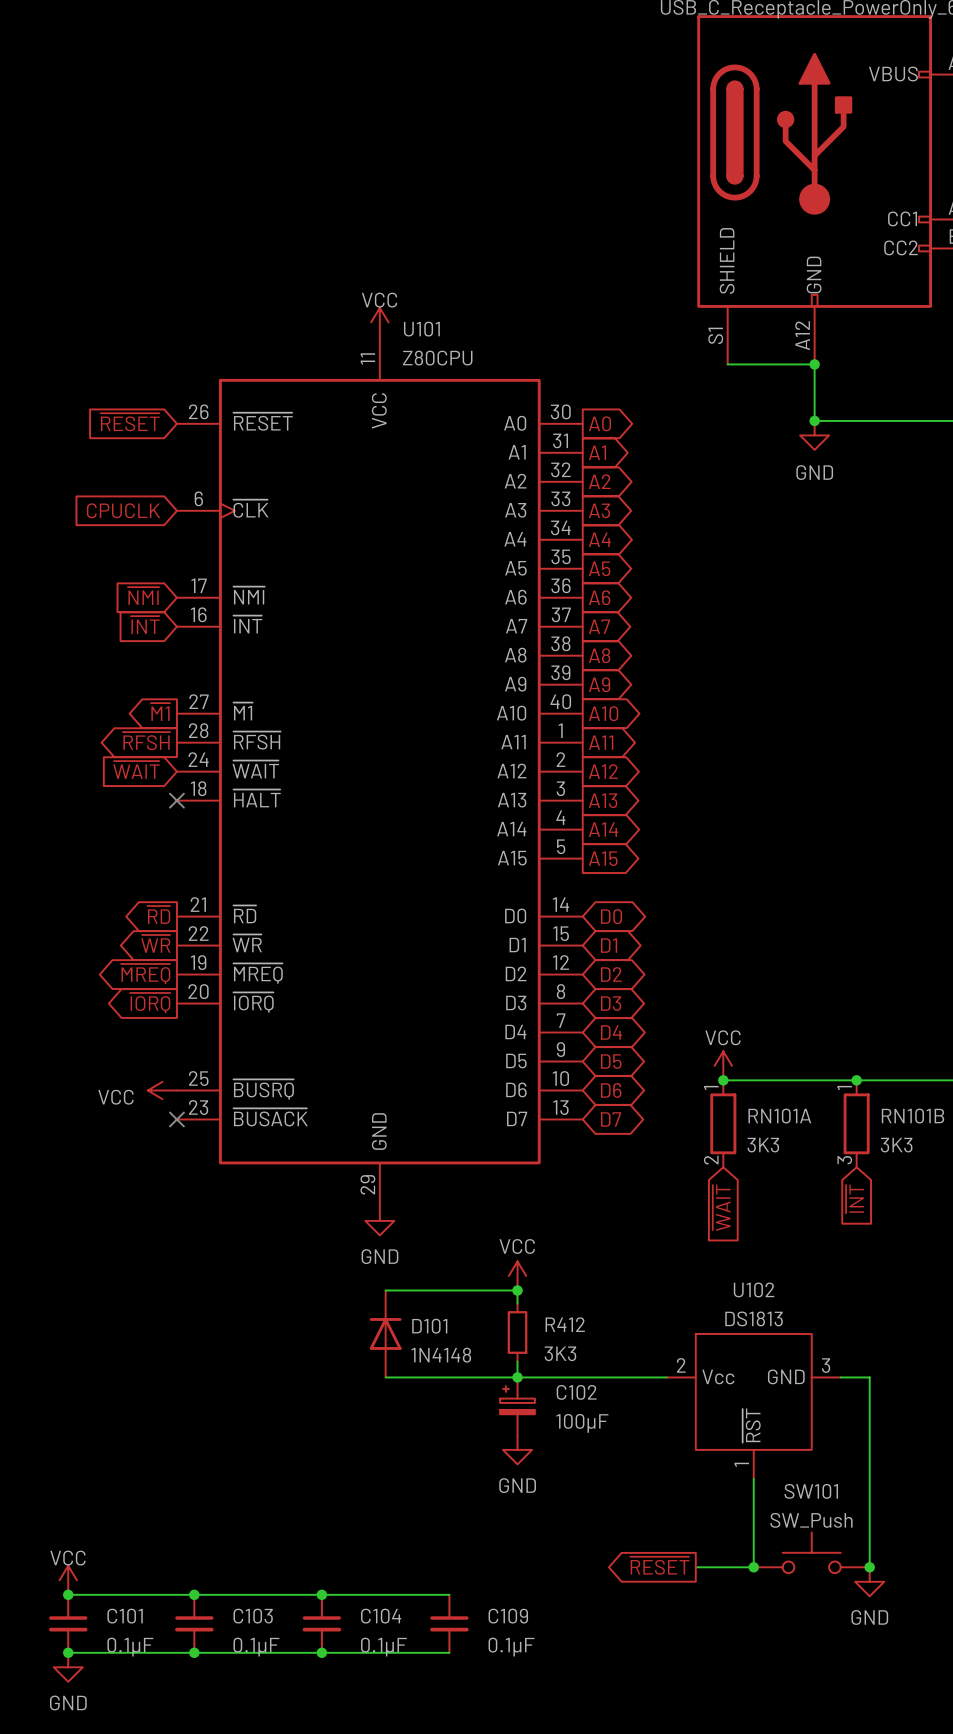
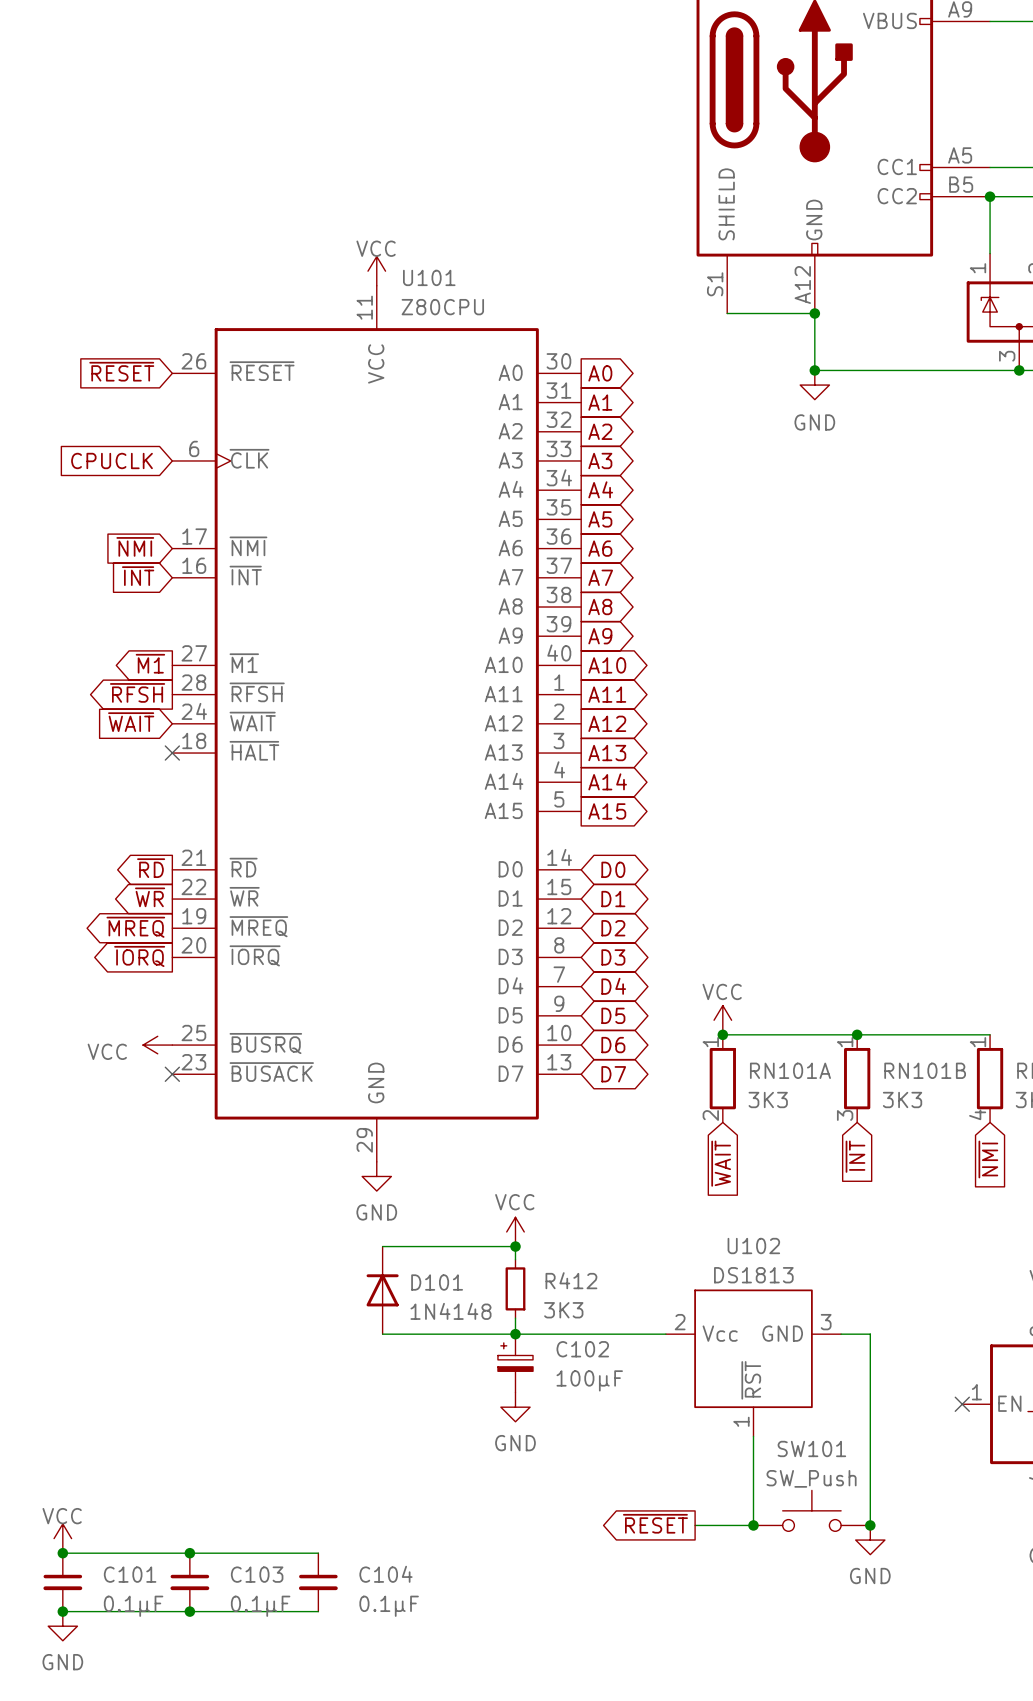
wire: (321, 1594) (449, 1594) -> none
junction: (321, 1594) -> none
C109: 0.1µF (449, 1623) -> none
wire: (321, 1652) (449, 1652) -> none
junction: (321, 1652) -> none

